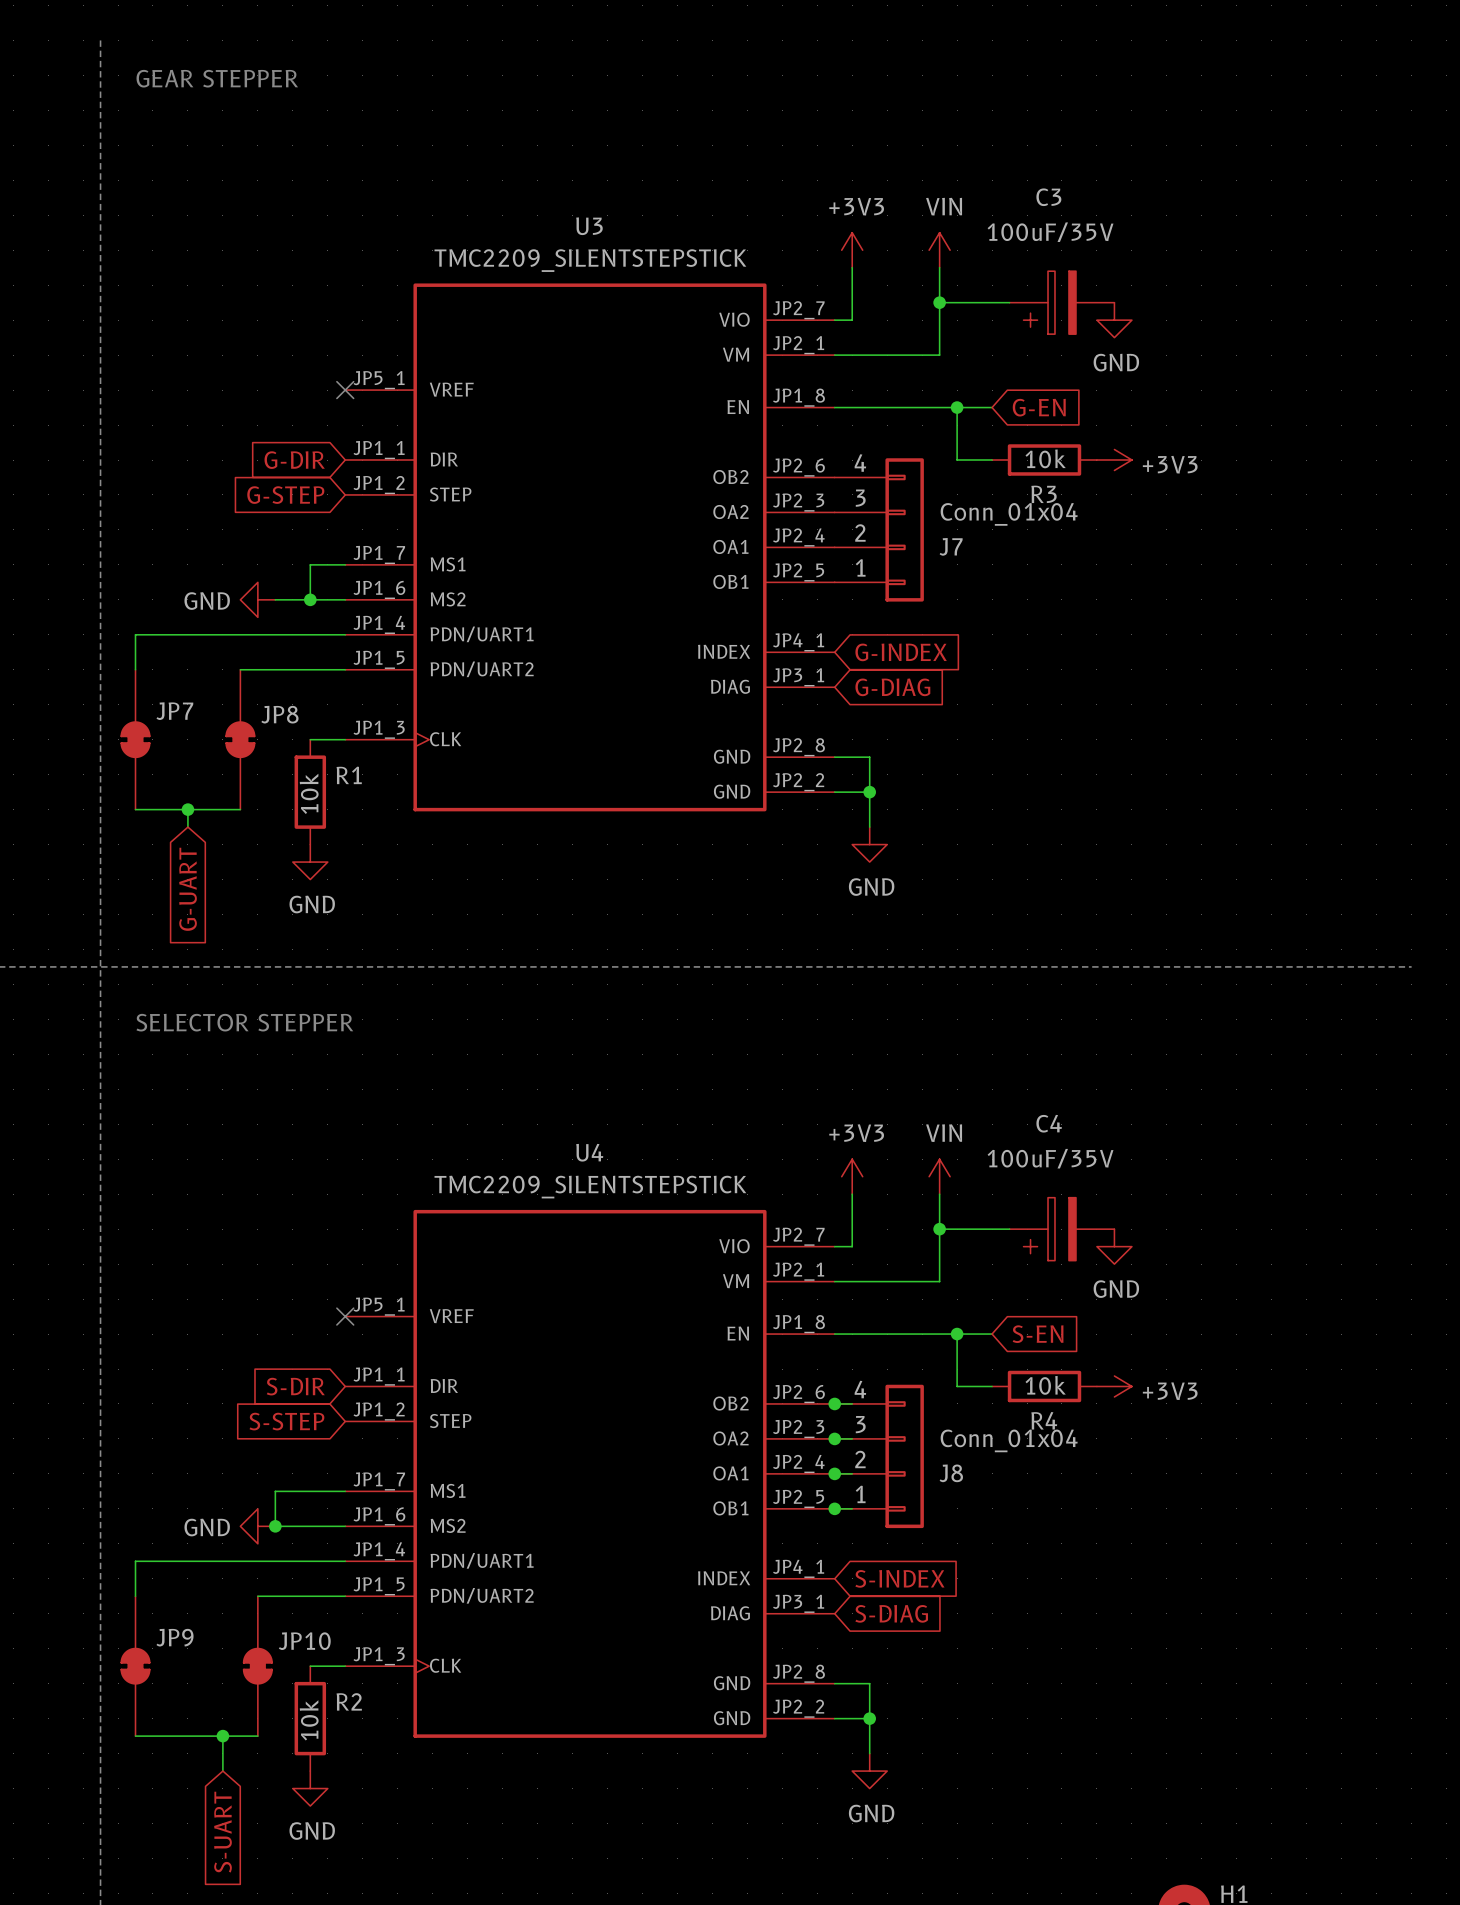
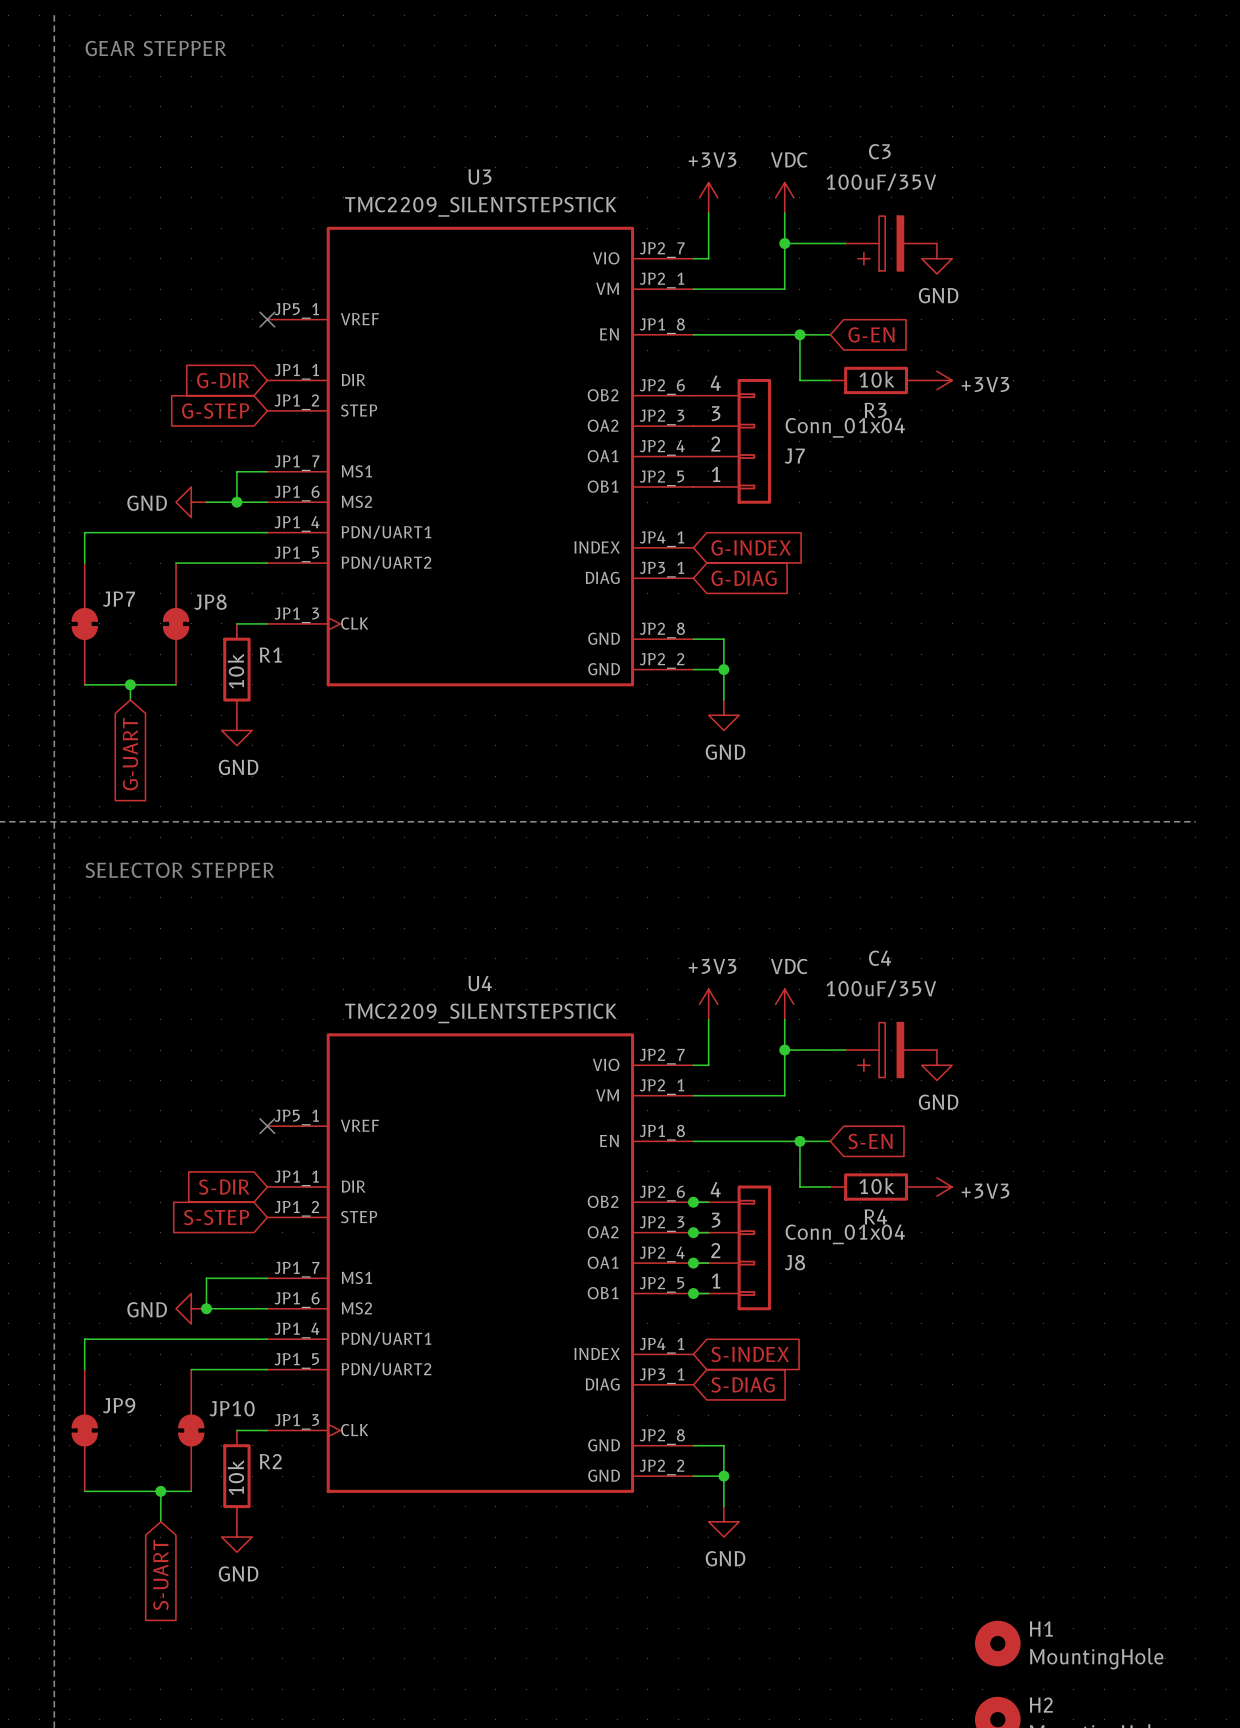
power symbol: VIN (939, 250) -> VDC (784, 197)
power symbol: VIN (939, 1176) -> VDC (784, 1004)

